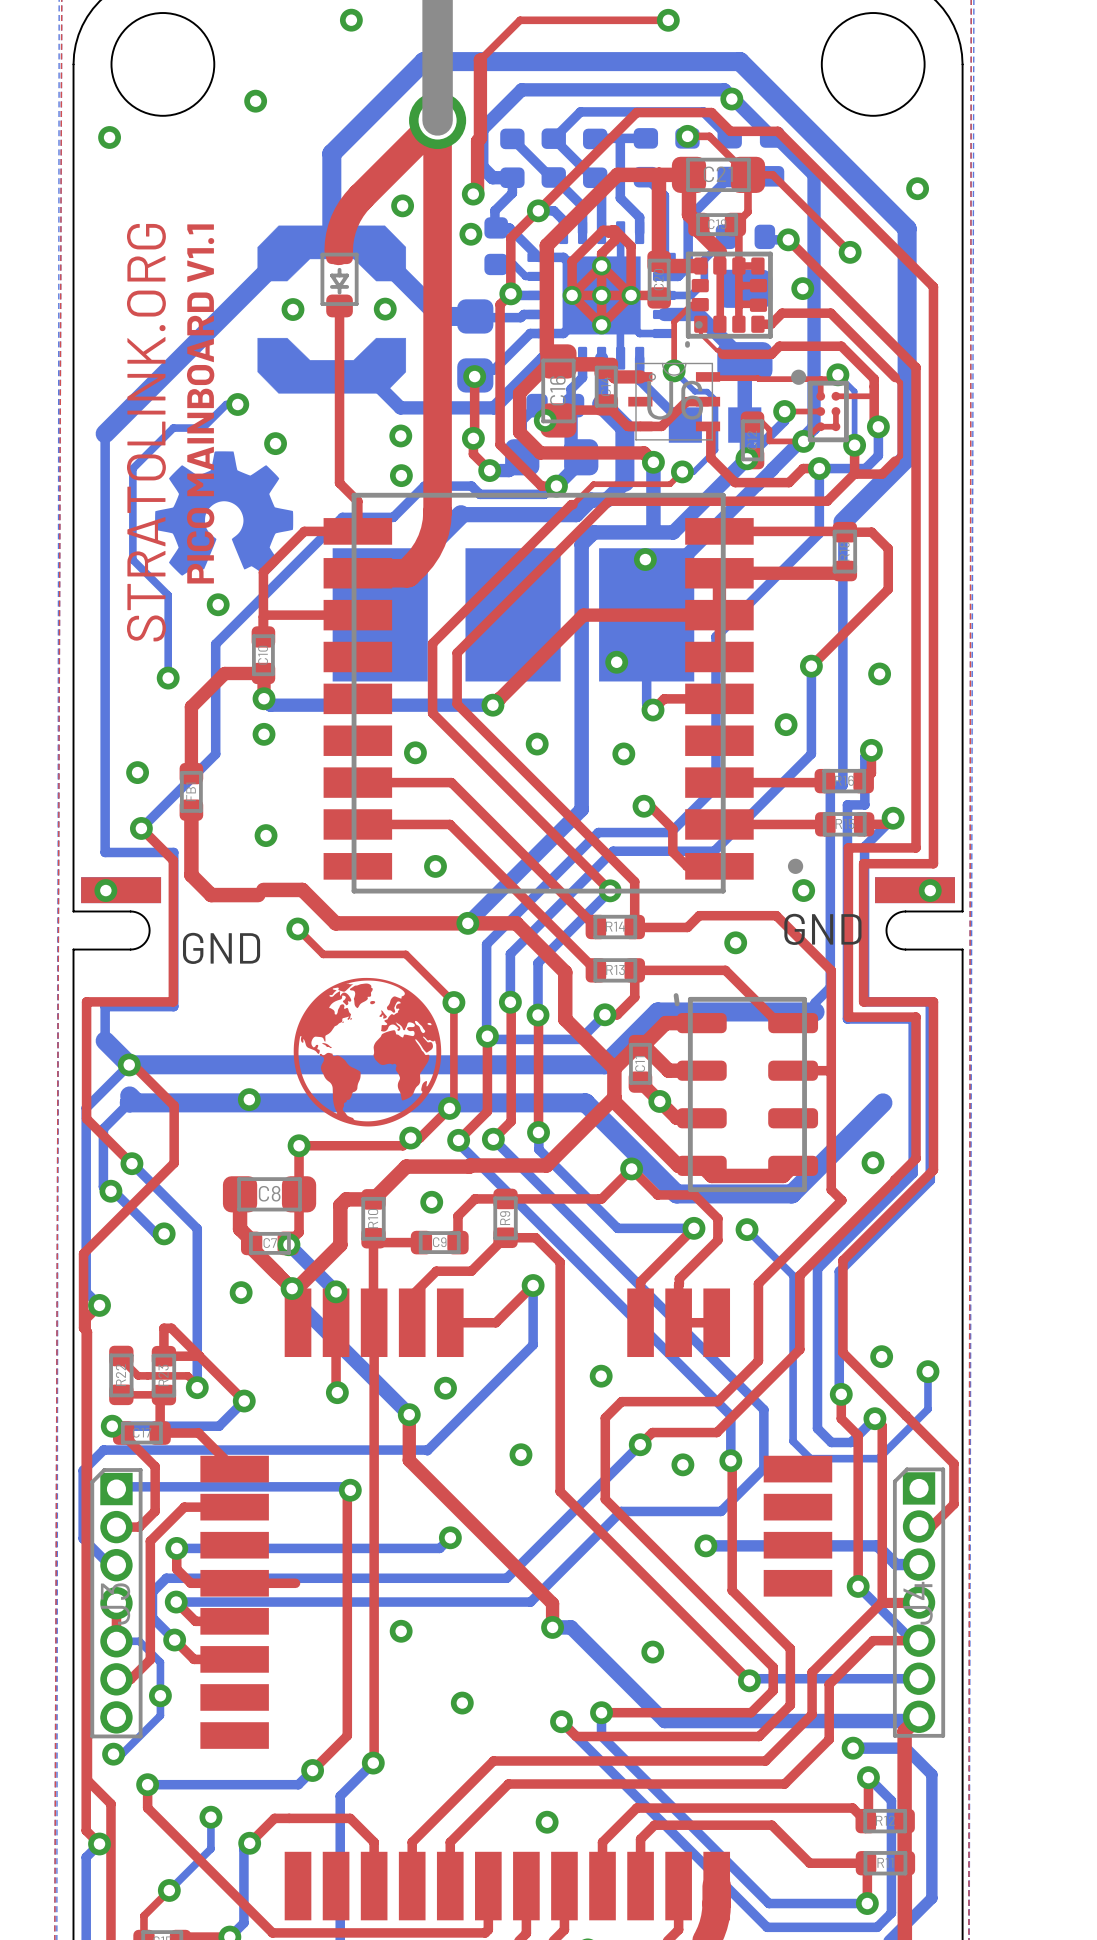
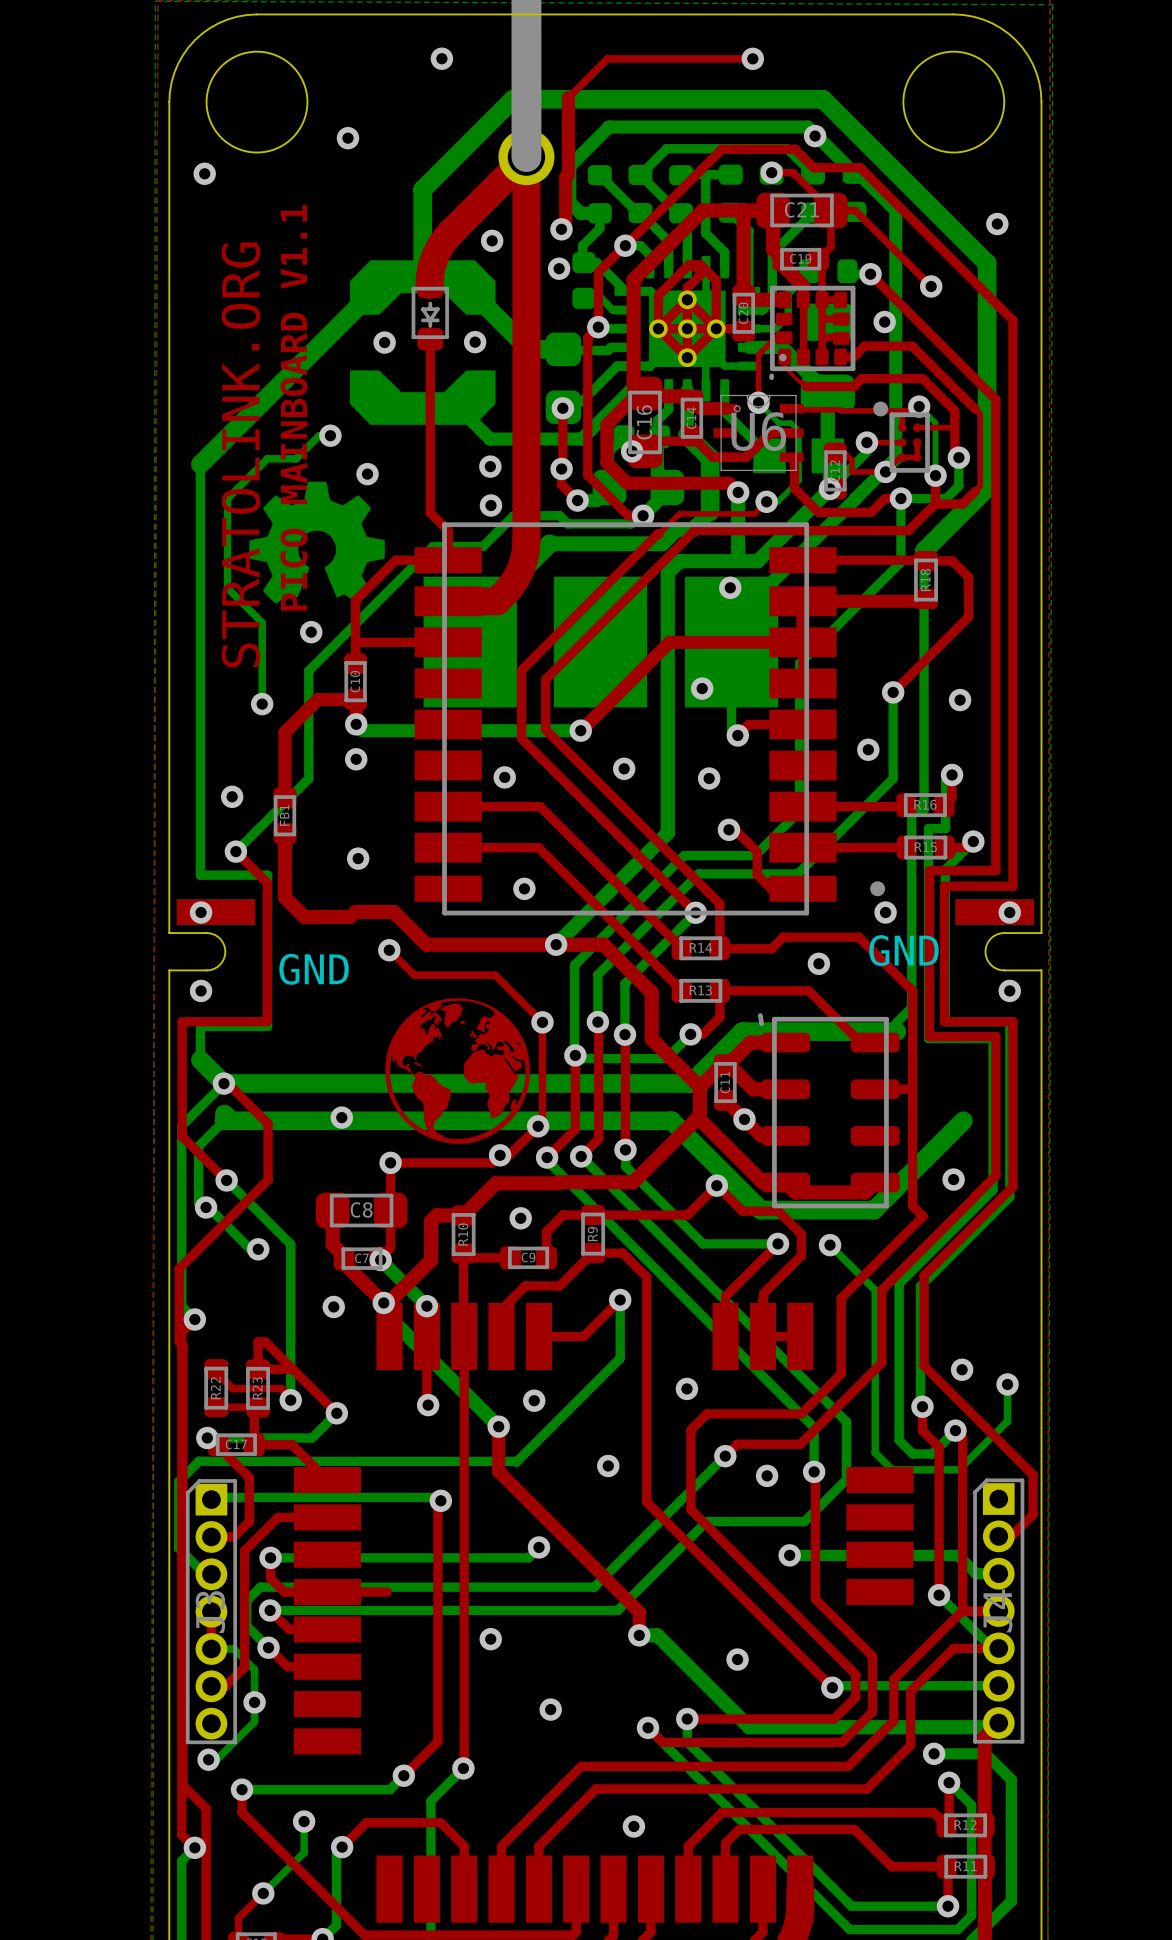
board edge: (111, 911) (133, 911) (140, 914) (147, 921) (149, 930) (147, 940) (140, 946) (133, 949) (111, 949) -> (206, 933) (215, 935) (220, 939) (225, 951) (220, 964) (215, 968) (206, 970)
board edge: (924, 911) (903, 911) (896, 913) (888, 921) (886, 930) (888, 939) (896, 947) (903, 949) (924, 949) -> (1004, 933) (990, 938) (985, 951) (990, 964) (1004, 970)
via: none -> (201, 990)
via: none -> (1009, 990)

